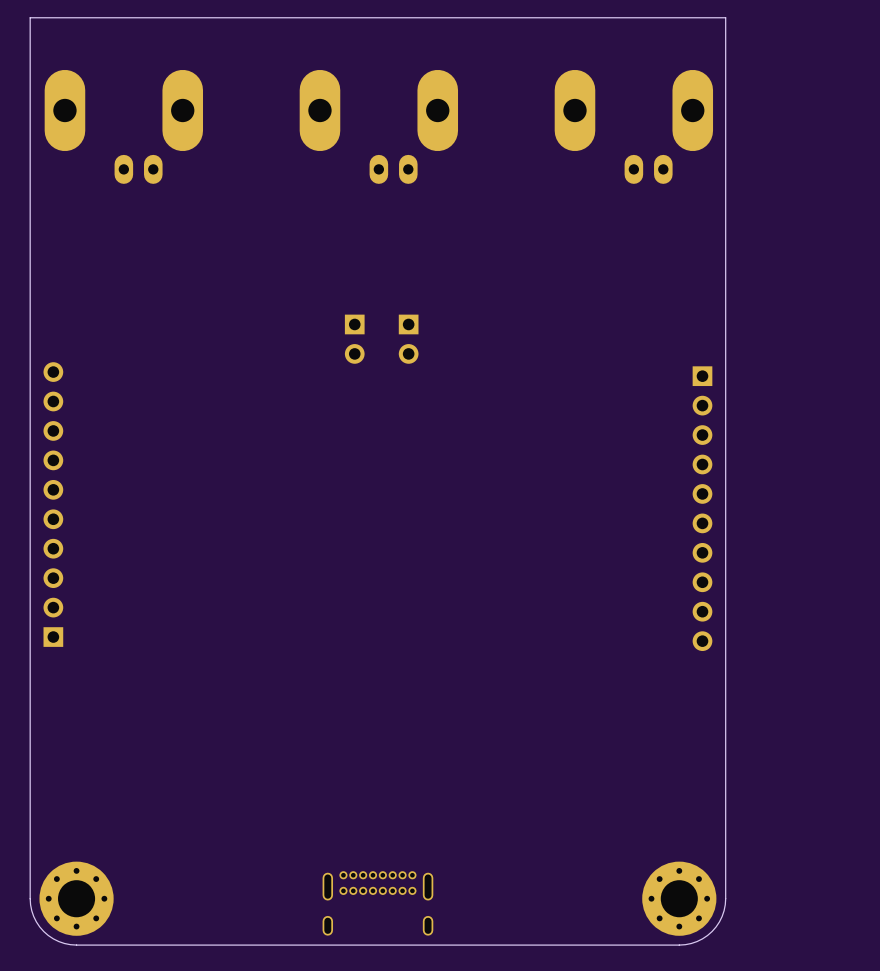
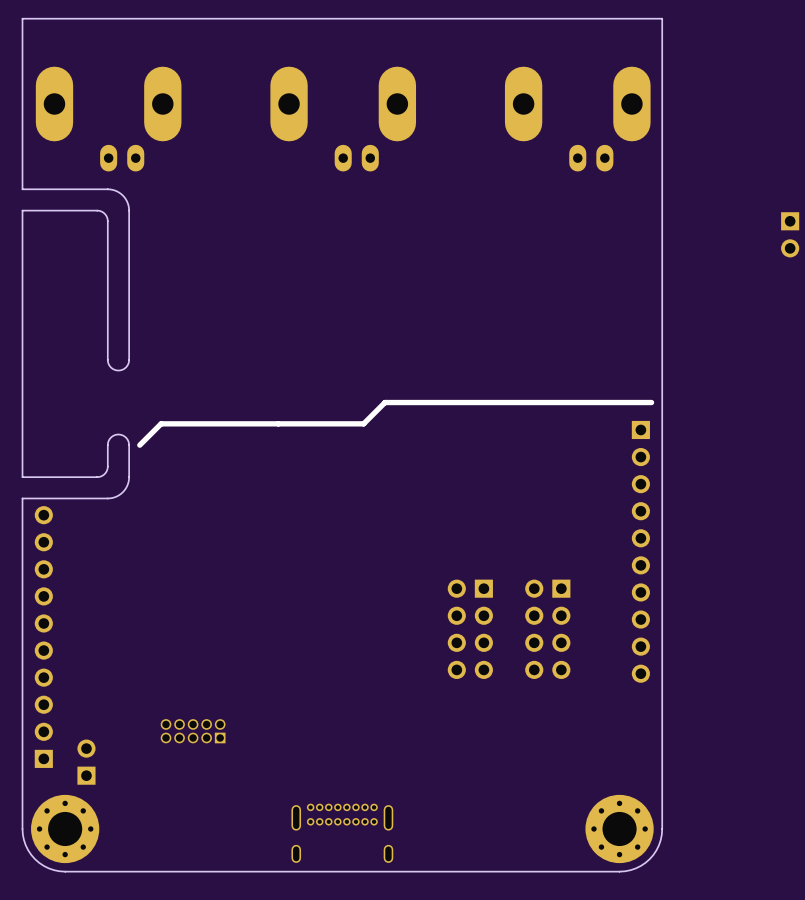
board edge: (30, 203) (30, 226) -> (22, 189) (110, 189) (119, 192) (125, 199) (129, 210) (129, 359) (123, 369) (114, 369) (107, 361) (107, 221) (106, 215) (98, 210) (22, 210)
part: none -> (790, 234)
part: (354, 339) -> none
part: (408, 339) -> none
line: none -> (651, 402) (385, 402) (363, 423) (161, 423) (139, 445)
part position: (53, 504) -> (43, 637)
part position: (702, 508) -> (640, 551)
board edge: (30, 516) (30, 539) -> (22, 477) (100, 476) (107, 468) (107, 443) (110, 438) (114, 435) (121, 434) (128, 442) (128, 481) (124, 490) (117, 496) (107, 498) (22, 498)
part: none -> (470, 629)
part: none -> (547, 629)
part: none -> (193, 731)
part: none -> (86, 762)

